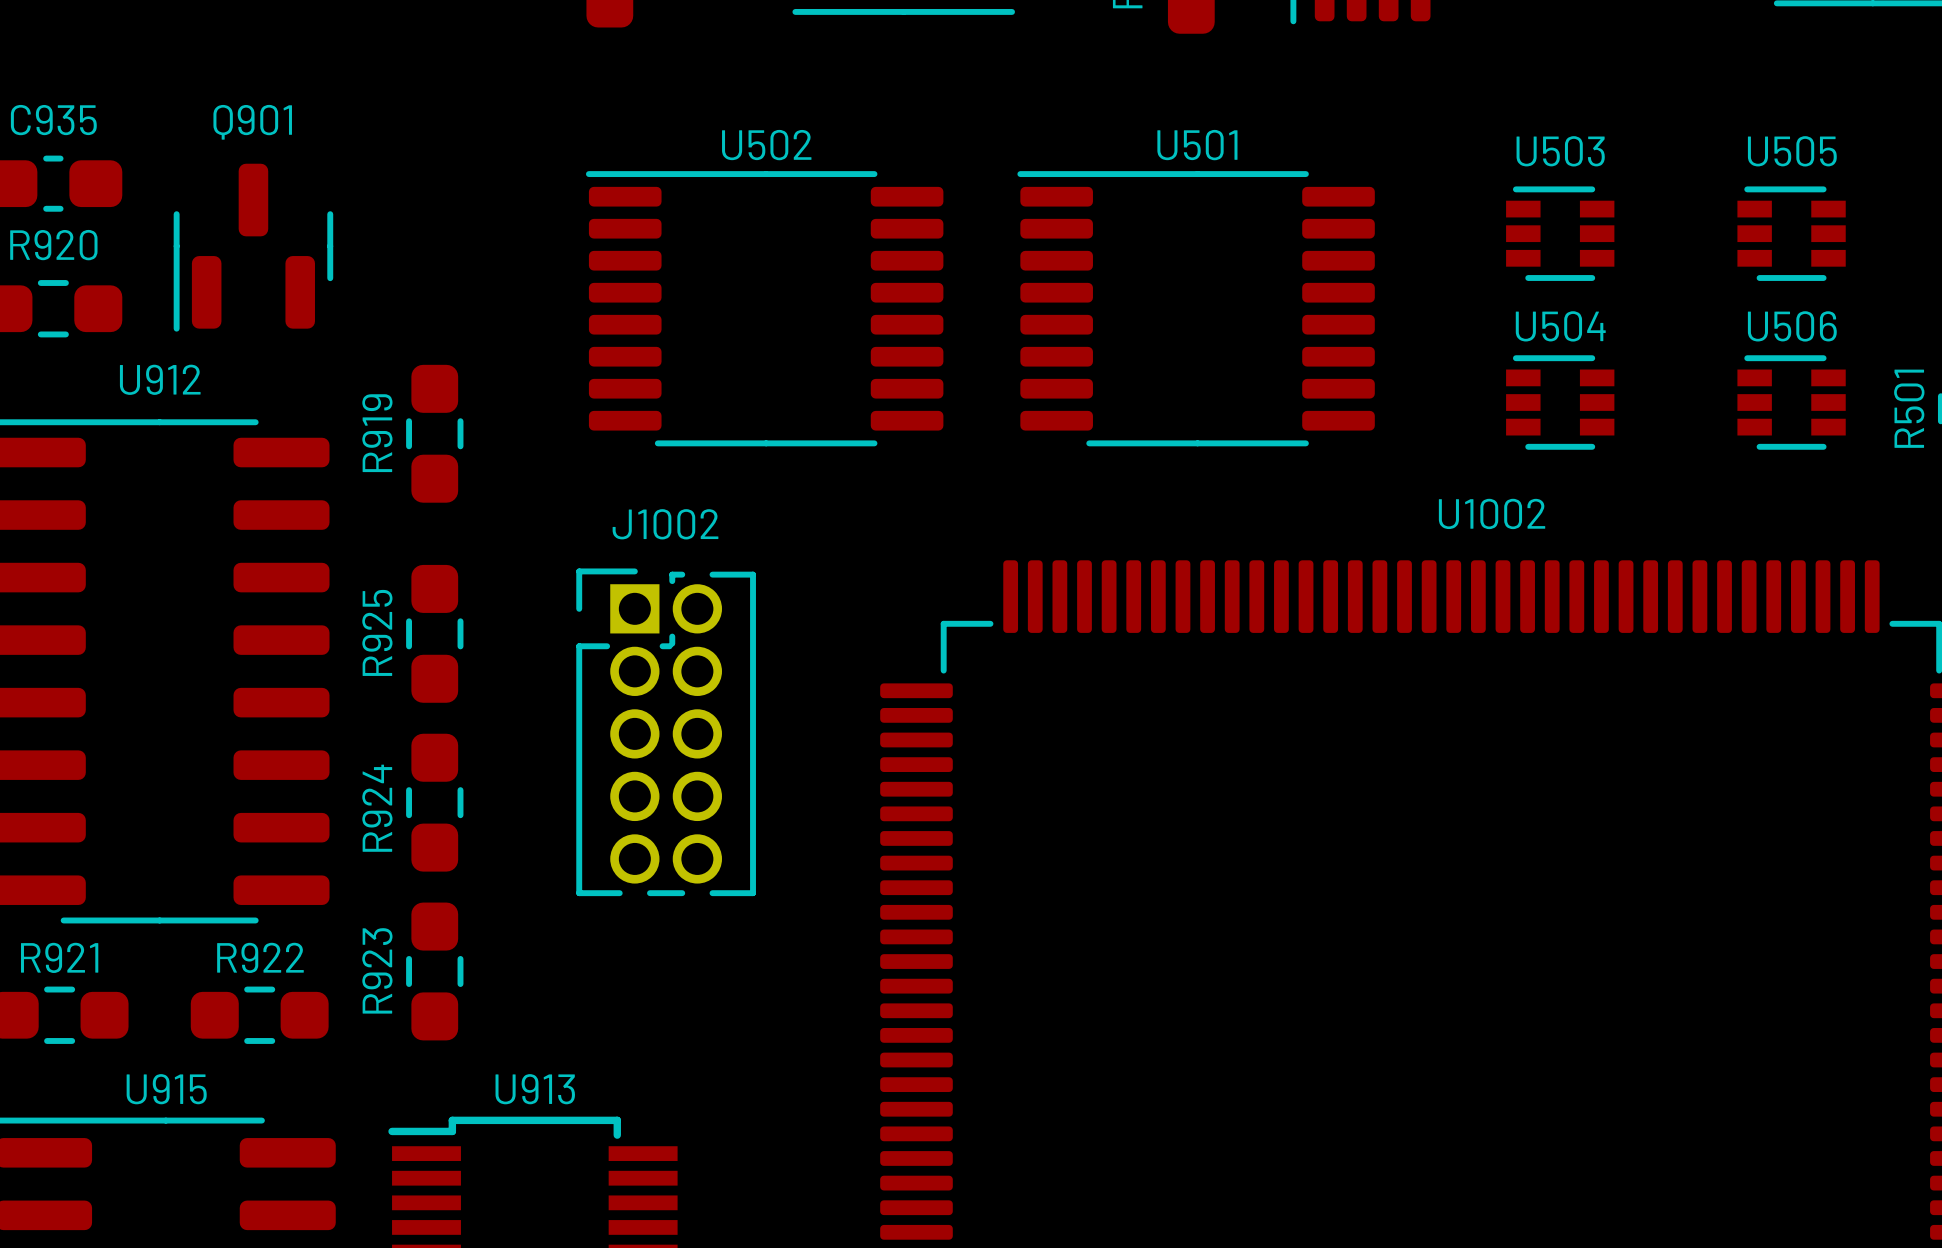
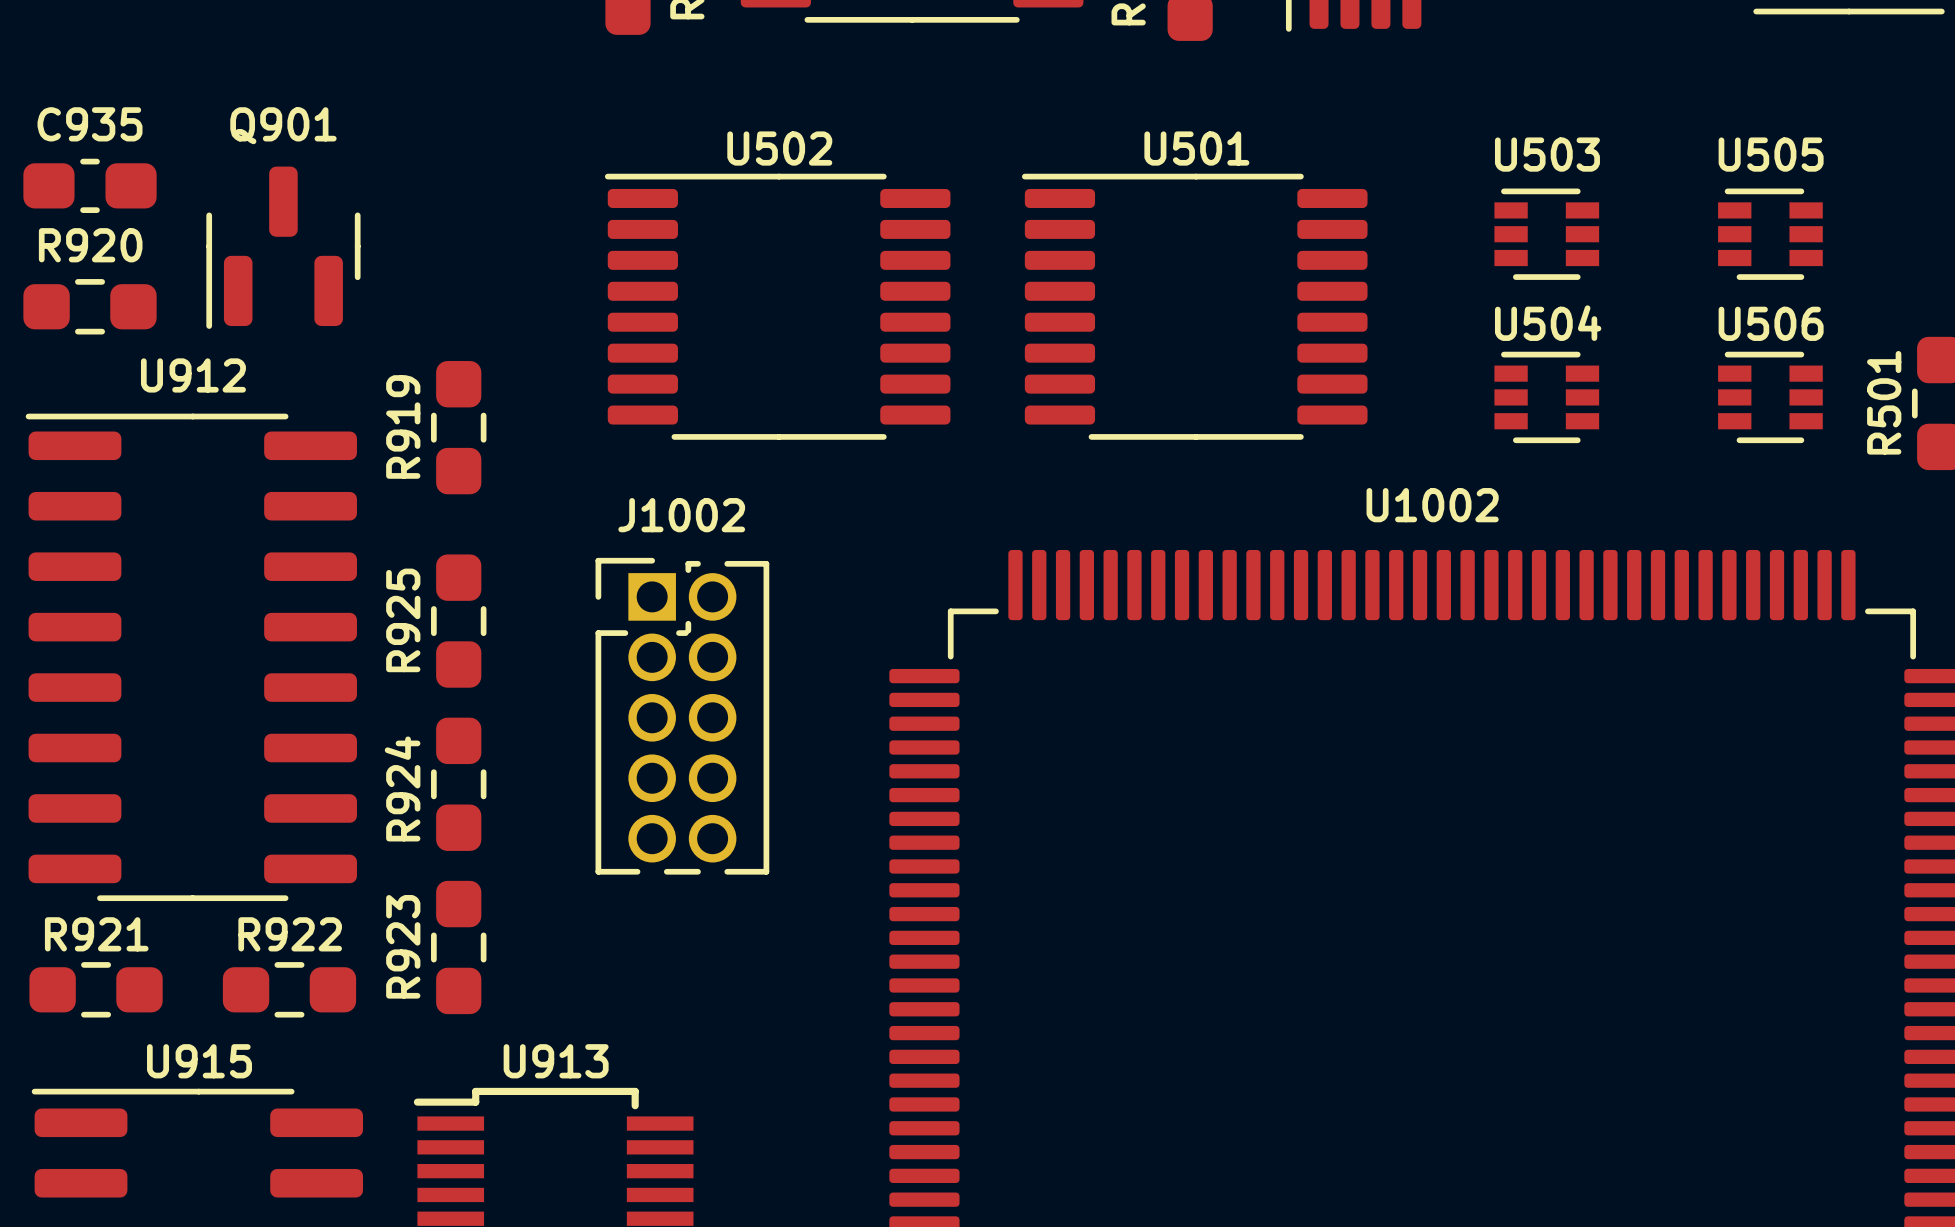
U1002 name position: U1002 (1492, 513) -> U1002 (1432, 505)

